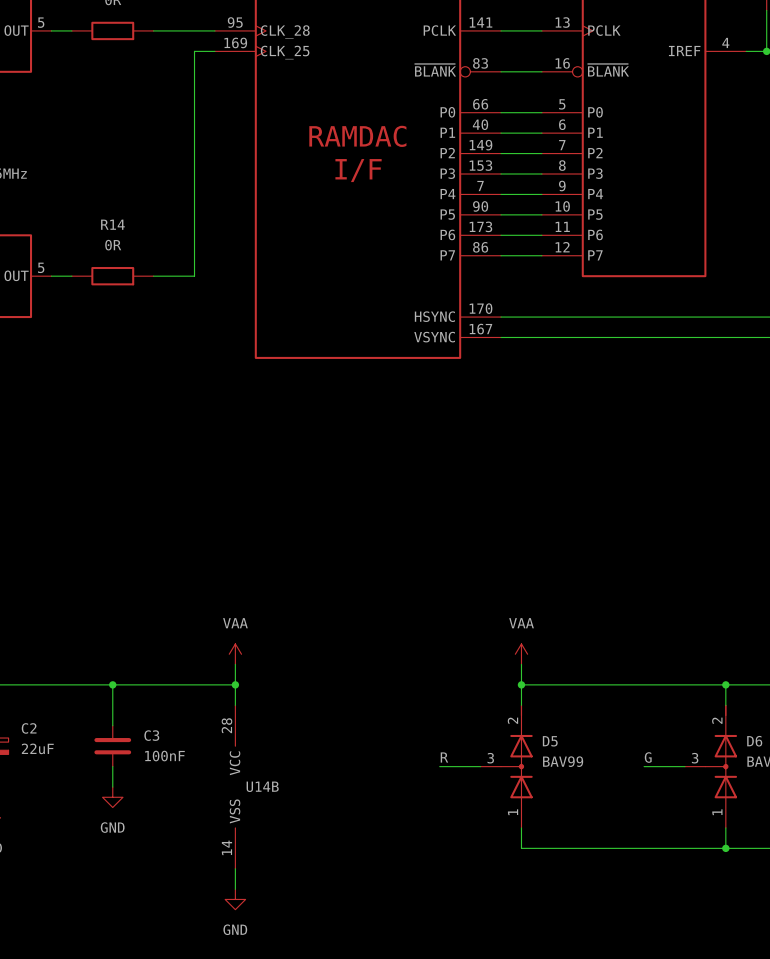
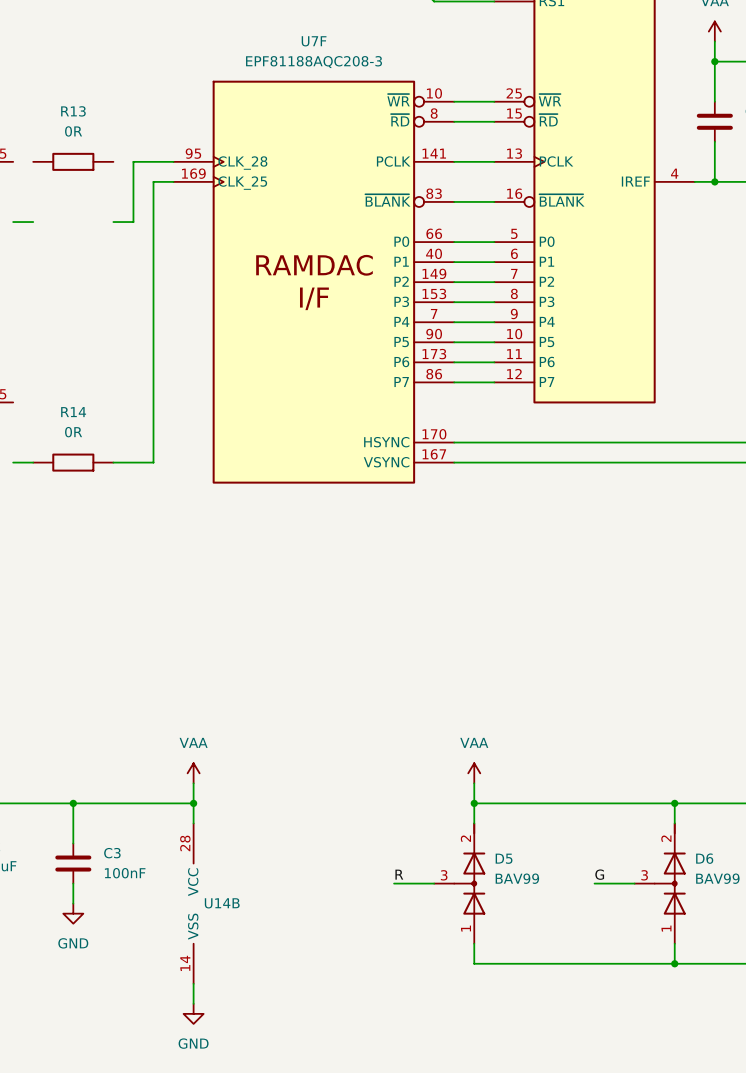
wire: (51, 30) (71, 30) -> (13, 222) (33, 222)
wire: (153, 30) (174, 30) -> (113, 222) (133, 222) (133, 161)
wire: (51, 276) (71, 276) -> (13, 462) (33, 462)
R14 position: (112, 276) -> (73, 462)
wire: (153, 276) (194, 276) -> (113, 462) (153, 462) (153, 402)

